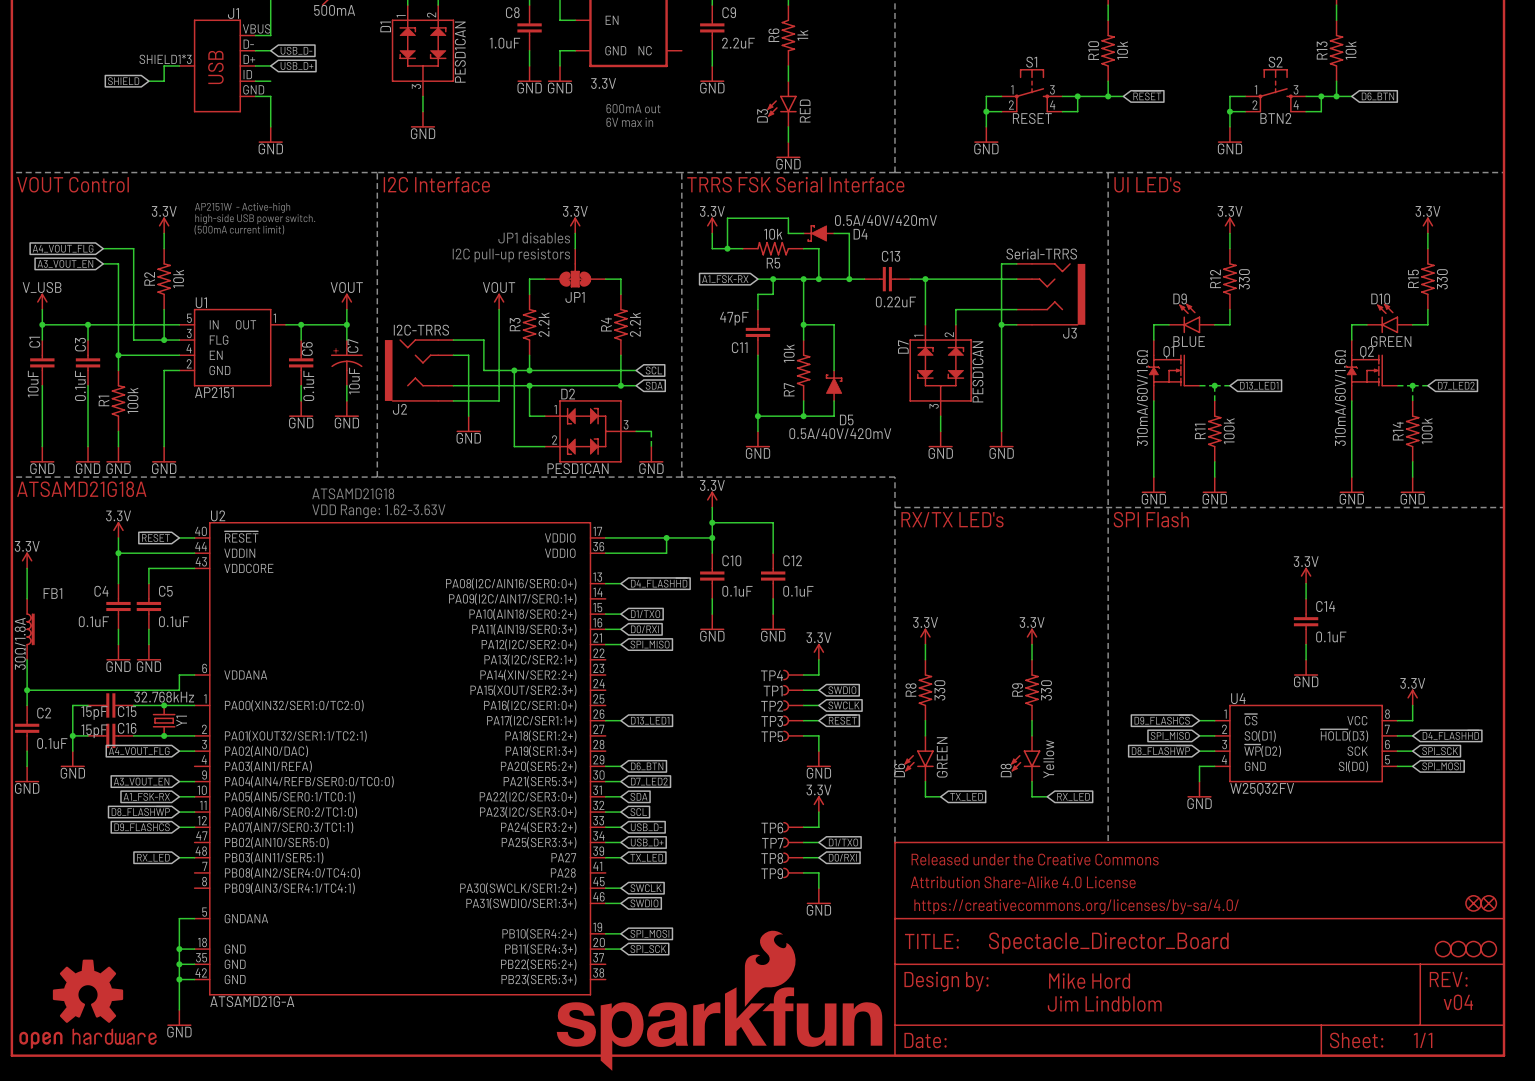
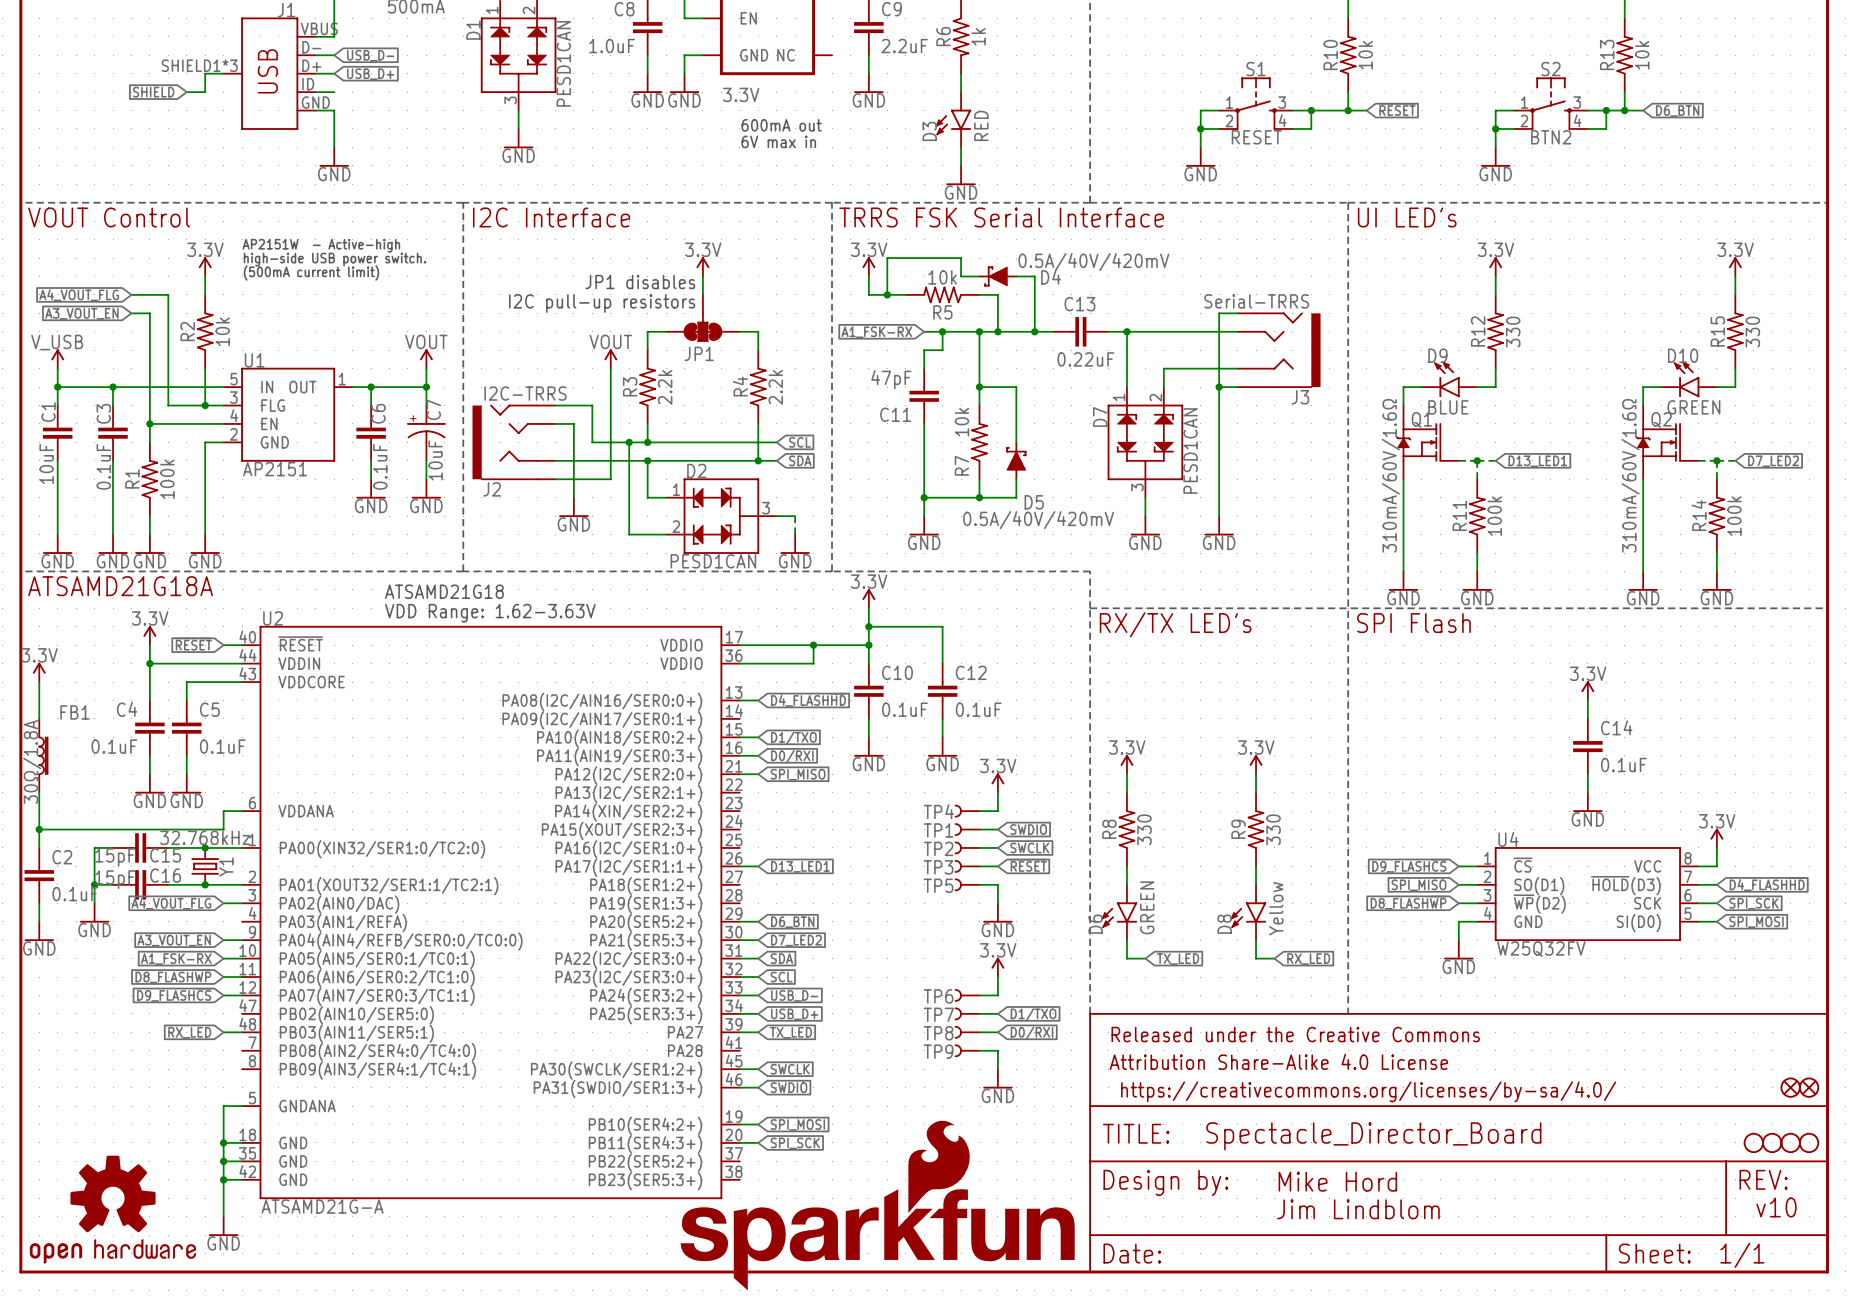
text: v04 (1458, 1002) -> v10 (1776, 1207)

